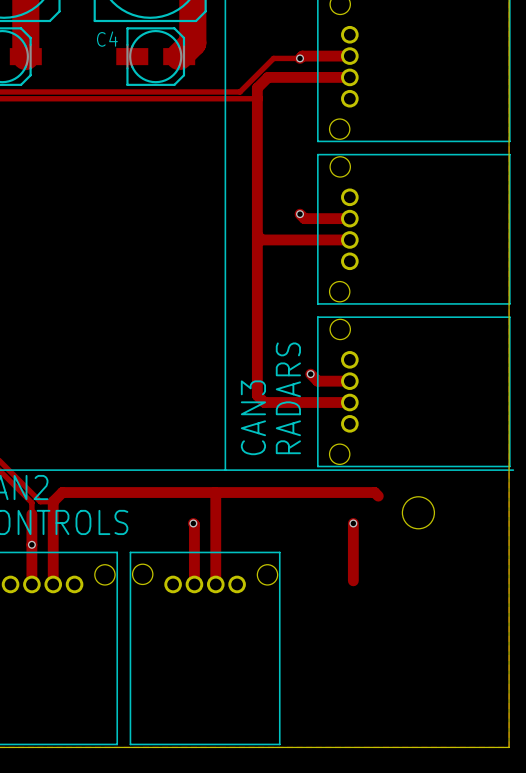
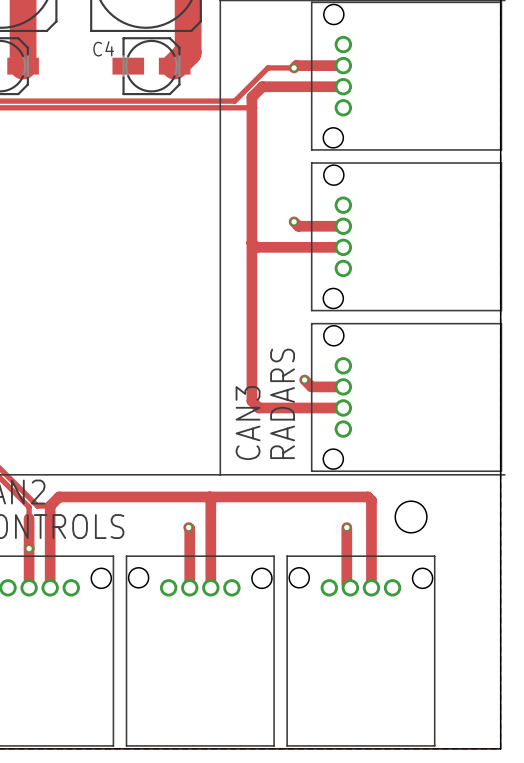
track: none -> (371, 500) (371, 587)
part: none -> (360, 651)

